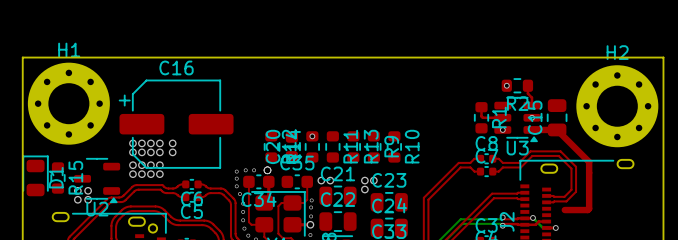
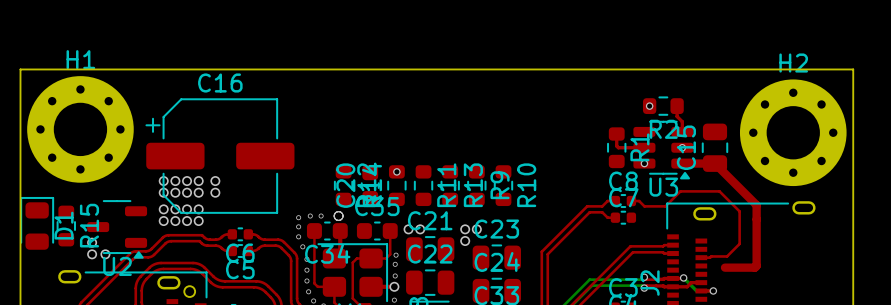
top track: (492, 171) (498, 171) (502, 167) (520, 167) (532, 155) (558, 155) (571, 168) (571, 189) (564, 196) (546, 195) -> none
via: (88, 190) -> none

